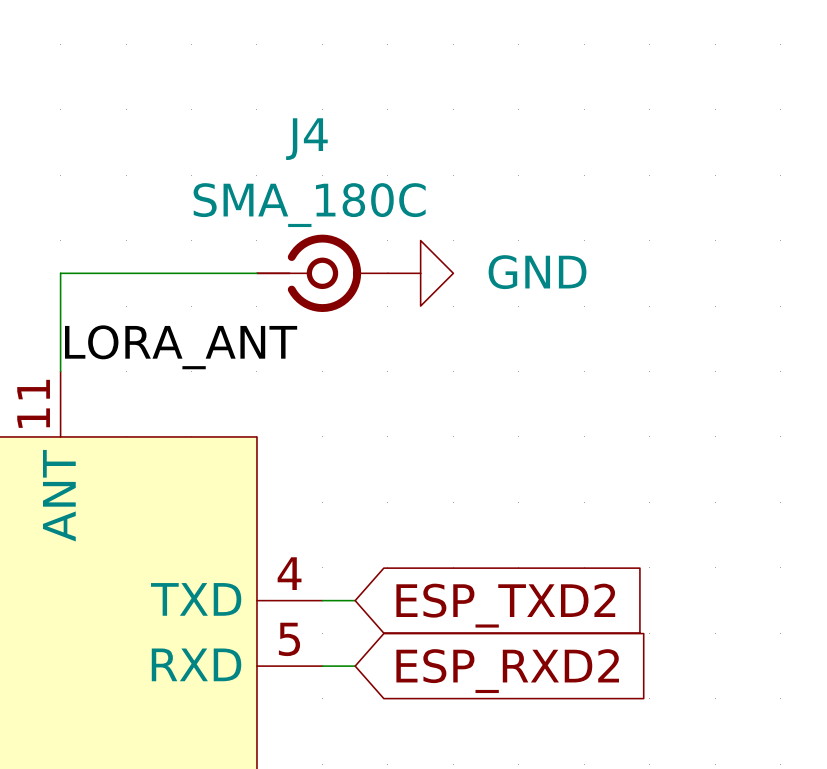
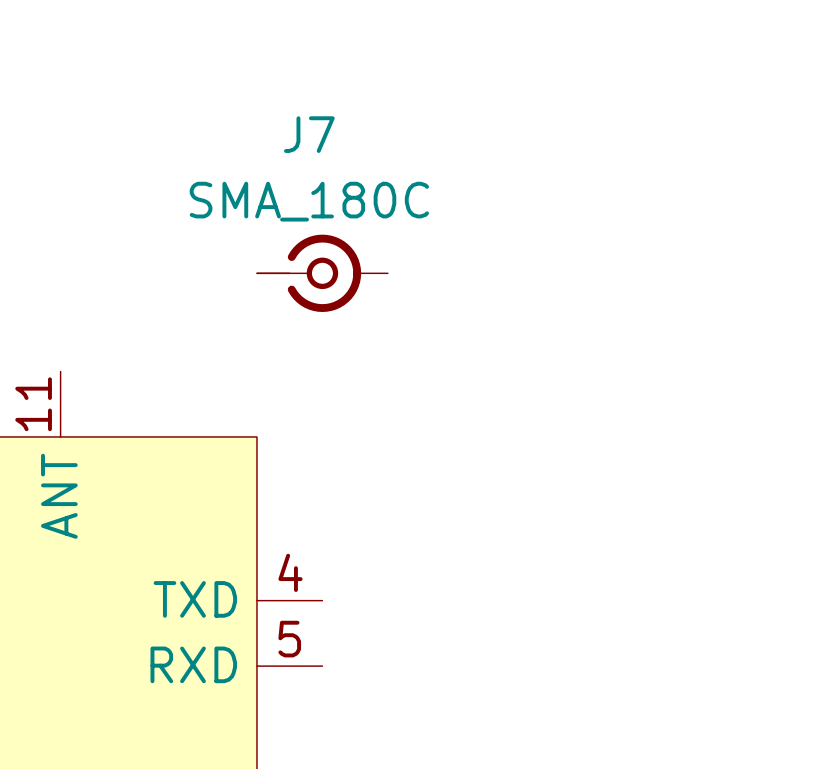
J4 name: J4 (306, 139) -> J7 (309, 134)
wire: (256, 273) (60, 273) (60, 371) -> none
power symbol: GND (420, 273) -> none
label: LORA_ANT (181, 347) -> none
wire: (322, 600) (355, 600) -> none
global label: ESP_TXD2 (505, 605) -> none
wire: (322, 666) (355, 666) -> none
global label: ESP_RXD2 (507, 671) -> none

